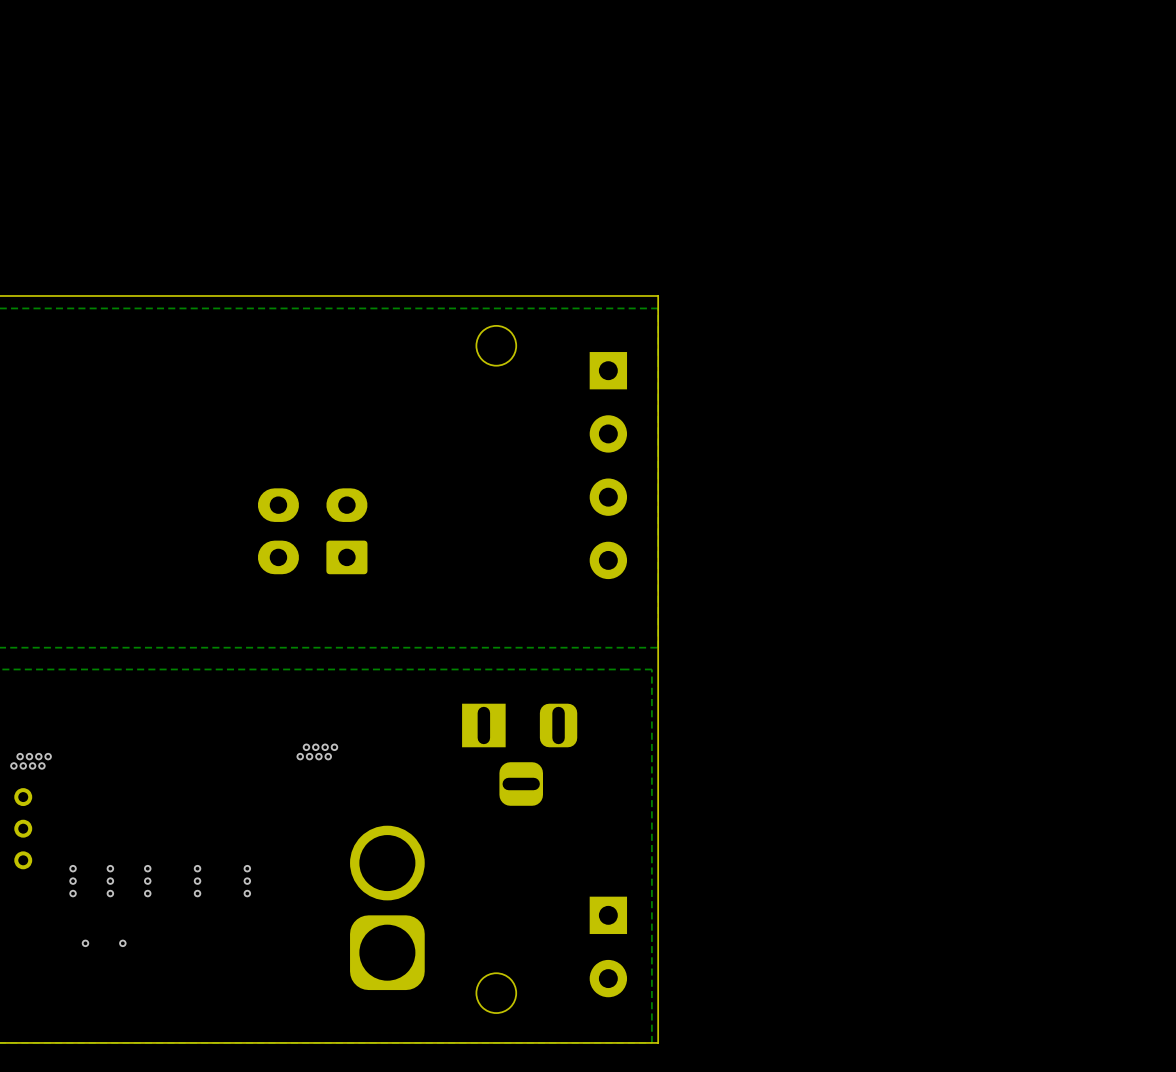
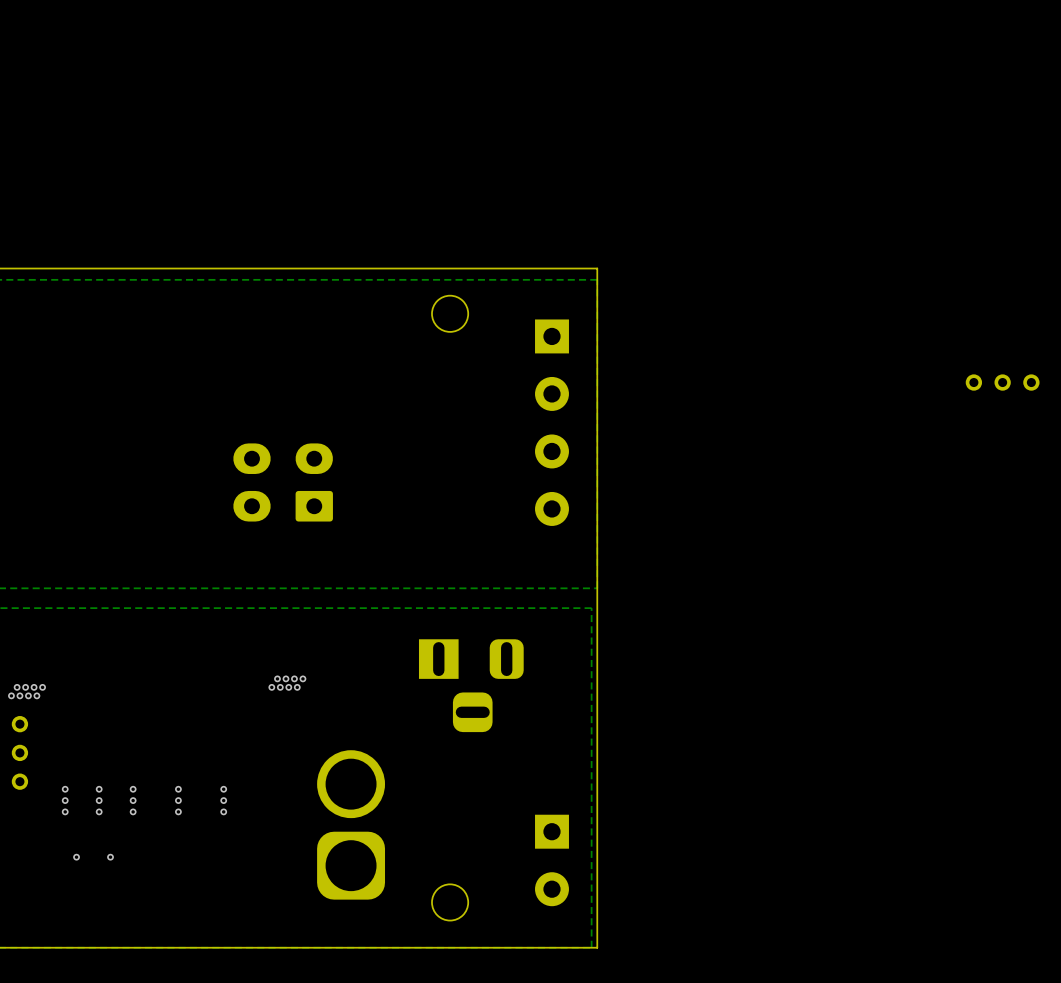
part: none -> (1002, 382)

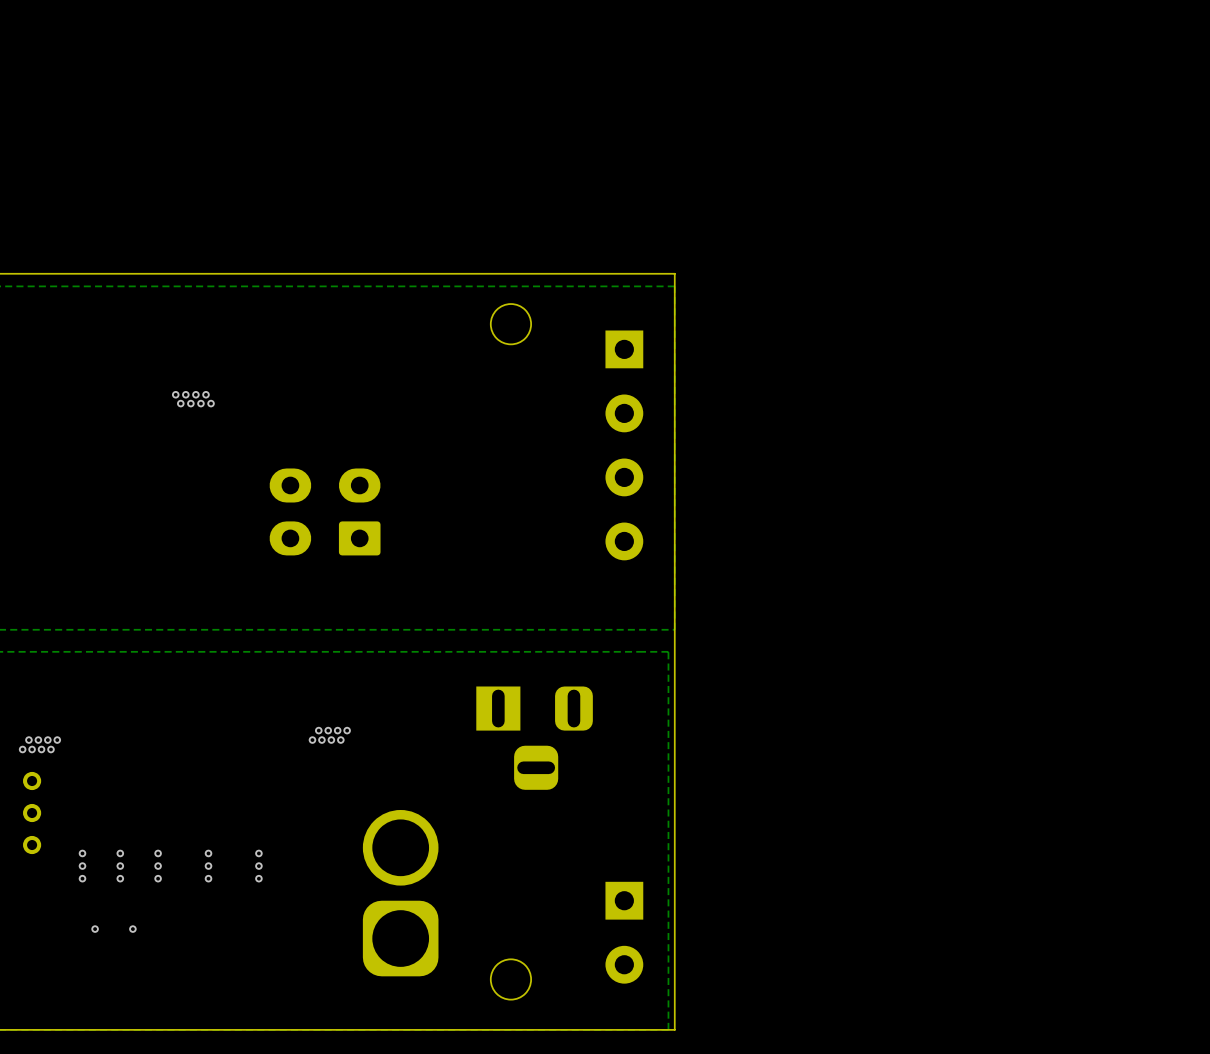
via: none -> (175, 394)
via: none -> (185, 394)
via: none -> (195, 394)
via: none -> (205, 394)
part: (1002, 382) -> none
via: none -> (180, 403)
via: none -> (190, 403)
via: none -> (200, 403)
via: none -> (211, 403)

